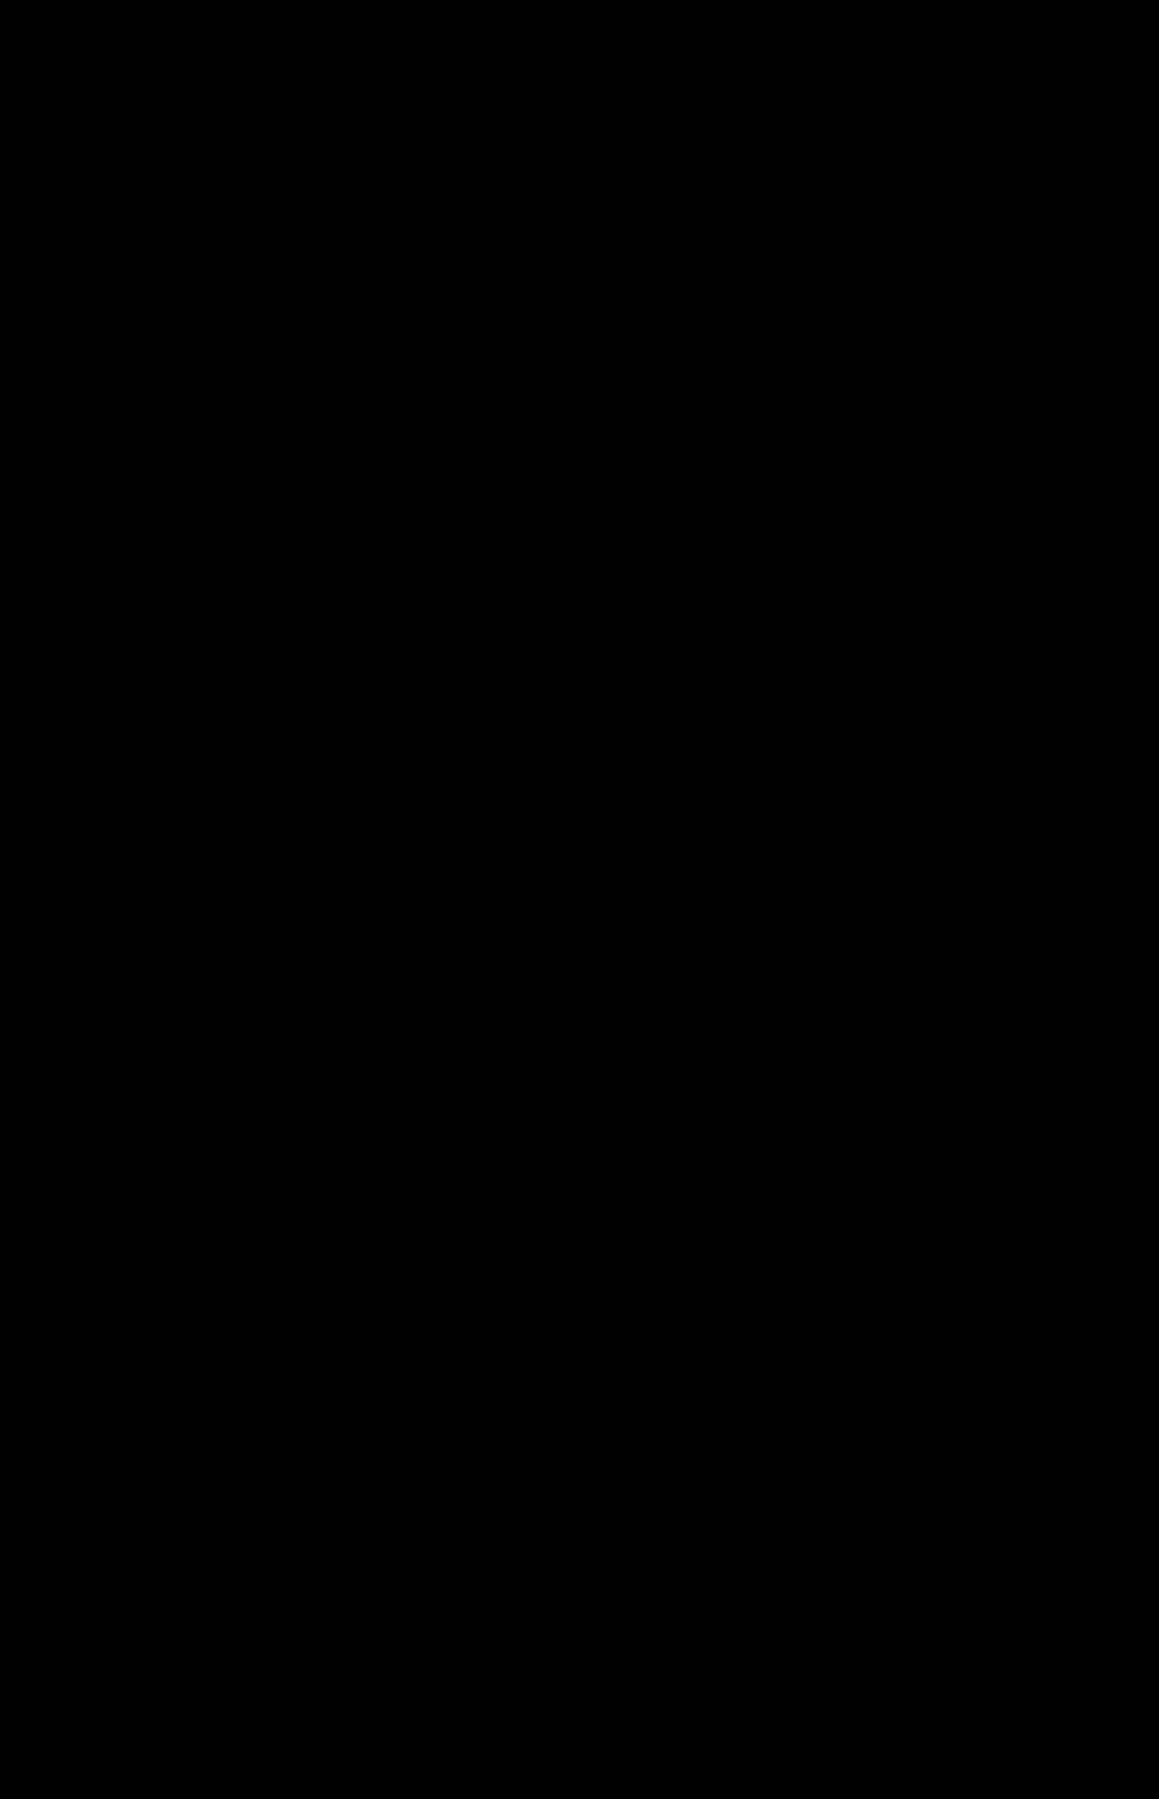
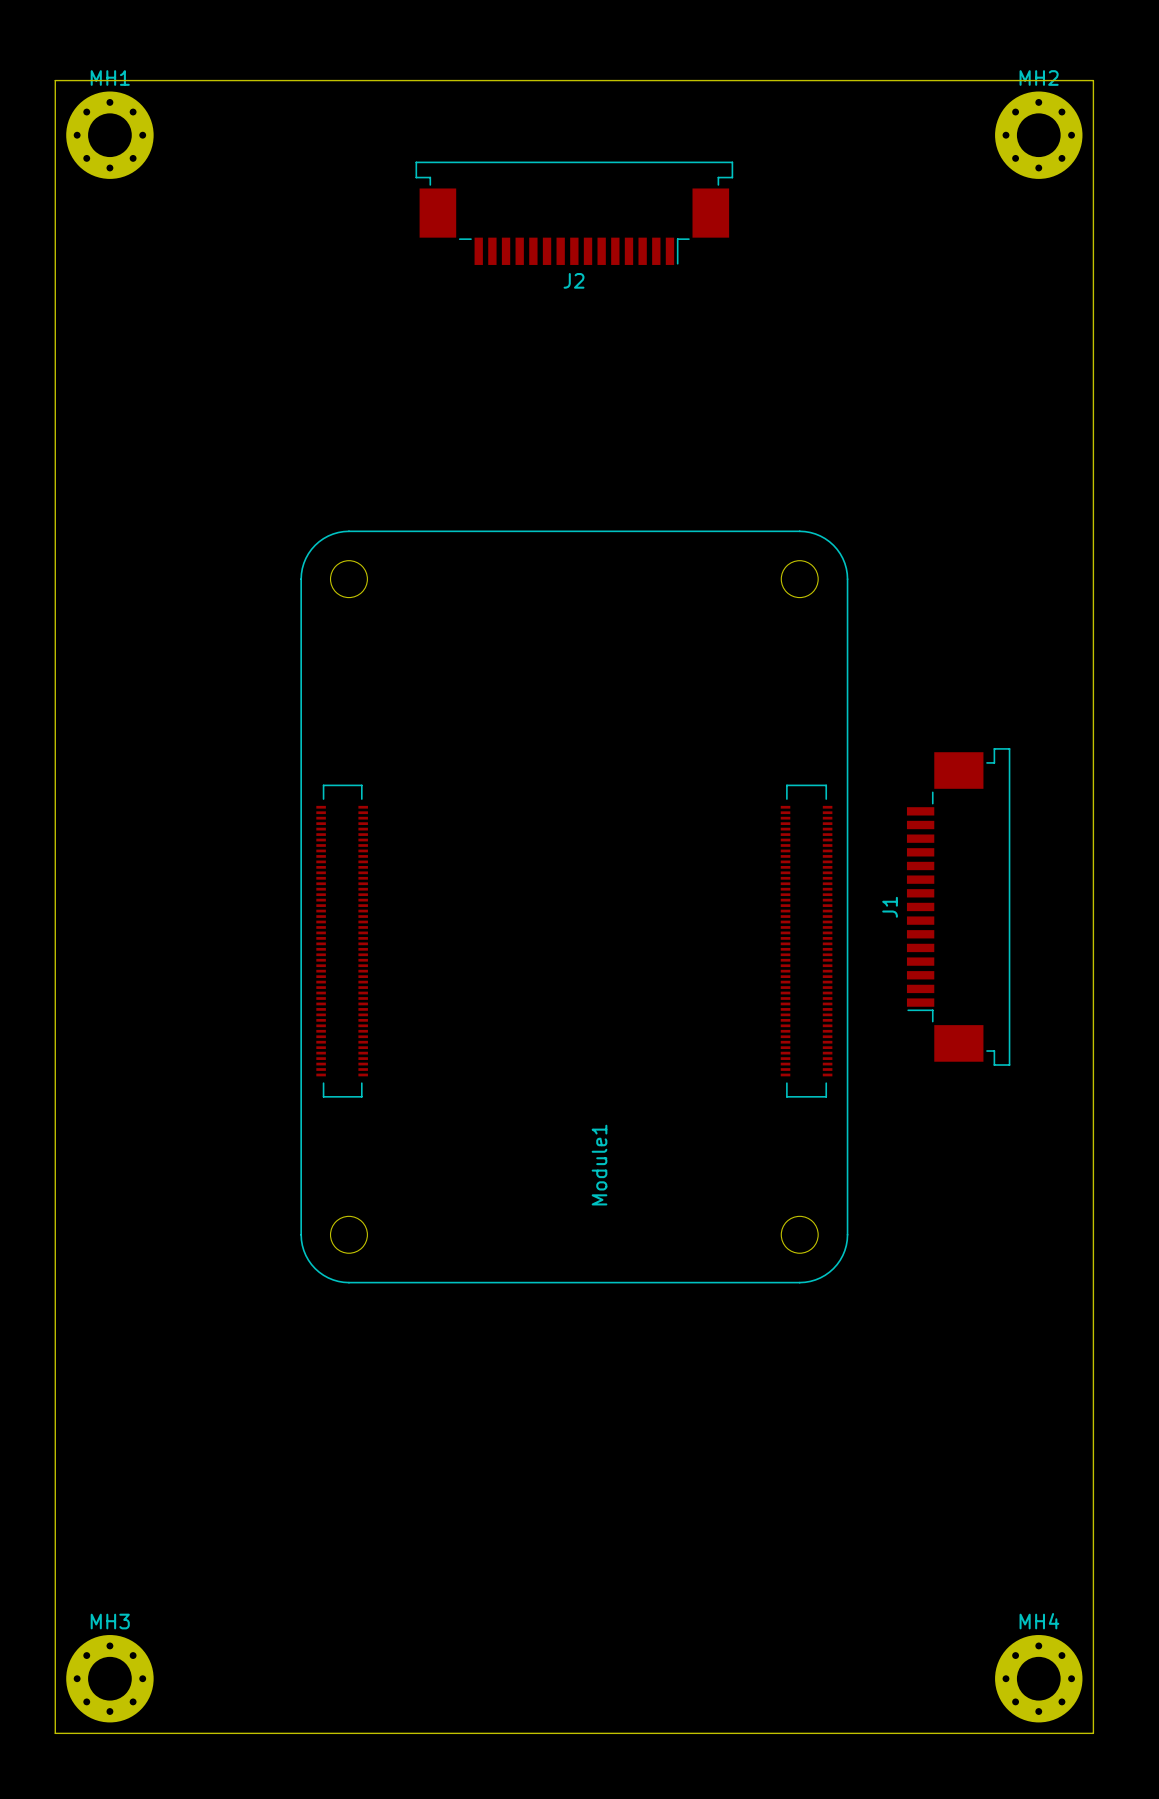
board edge: none -> (55, 80) (1093, 80) (1093, 1733) (55, 1733) (55, 80)
MH1: none -> (109, 135)
MH2: none -> (1038, 135)
J2: none -> (574, 213)
Module1: none -> (574, 906)
J1: none -> (958, 906)
MH3: none -> (109, 1678)
MH4: none -> (1038, 1678)

